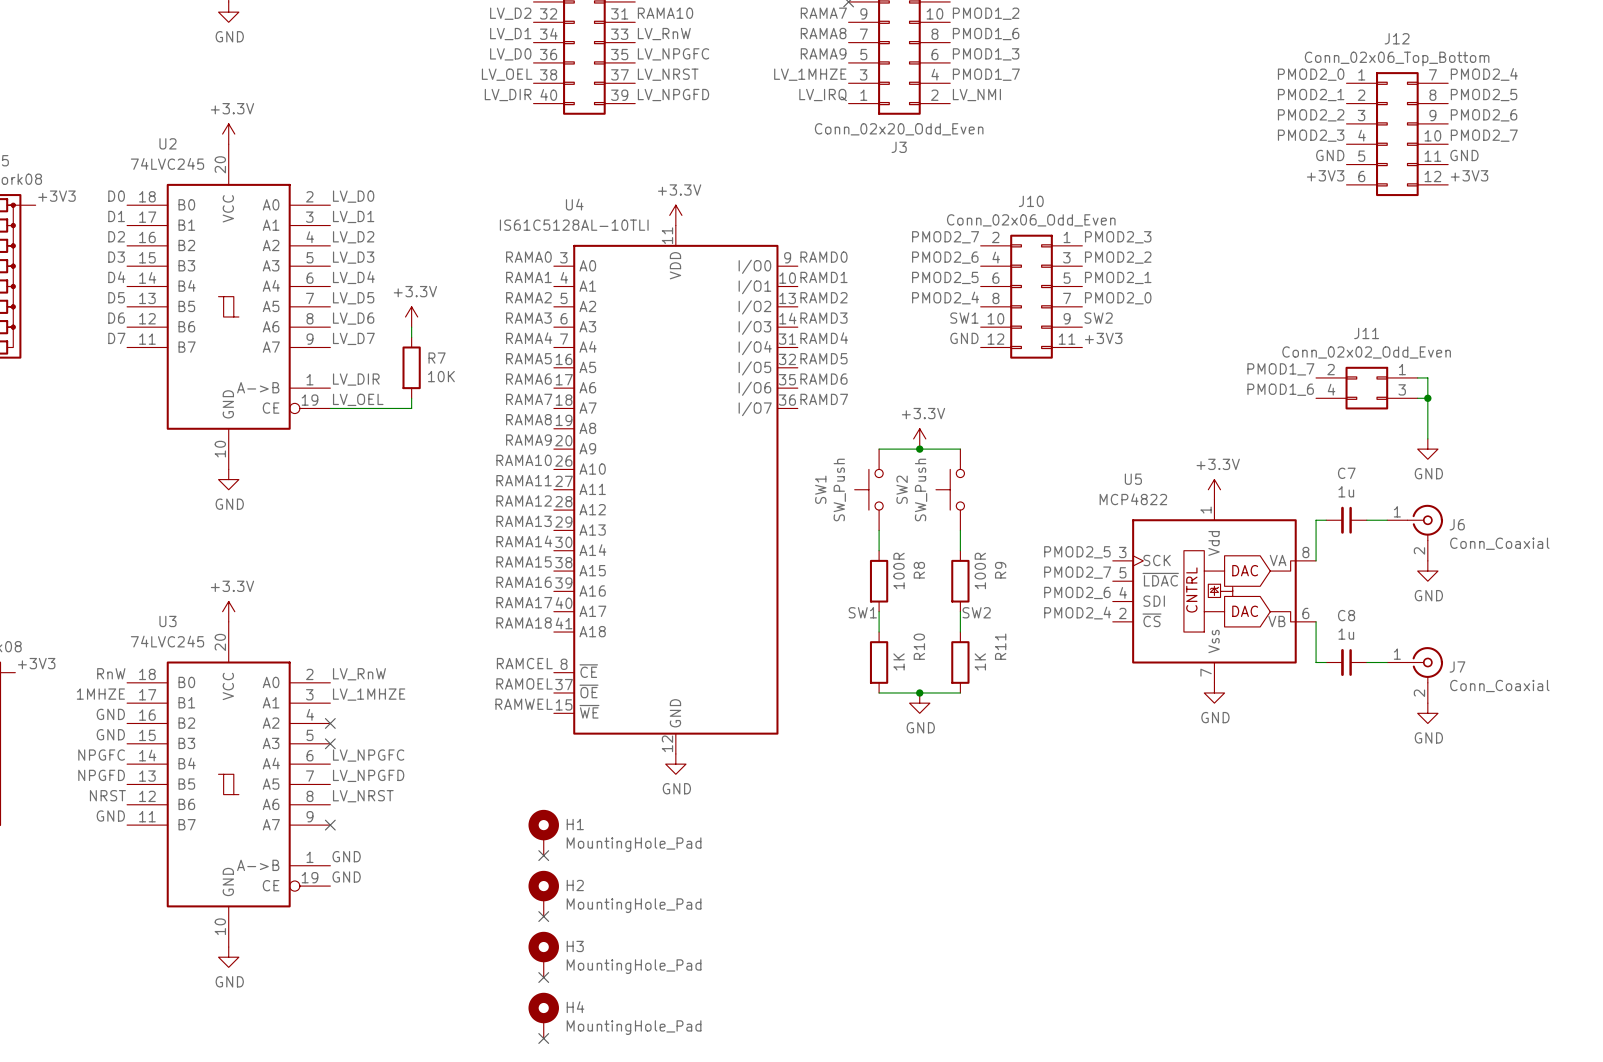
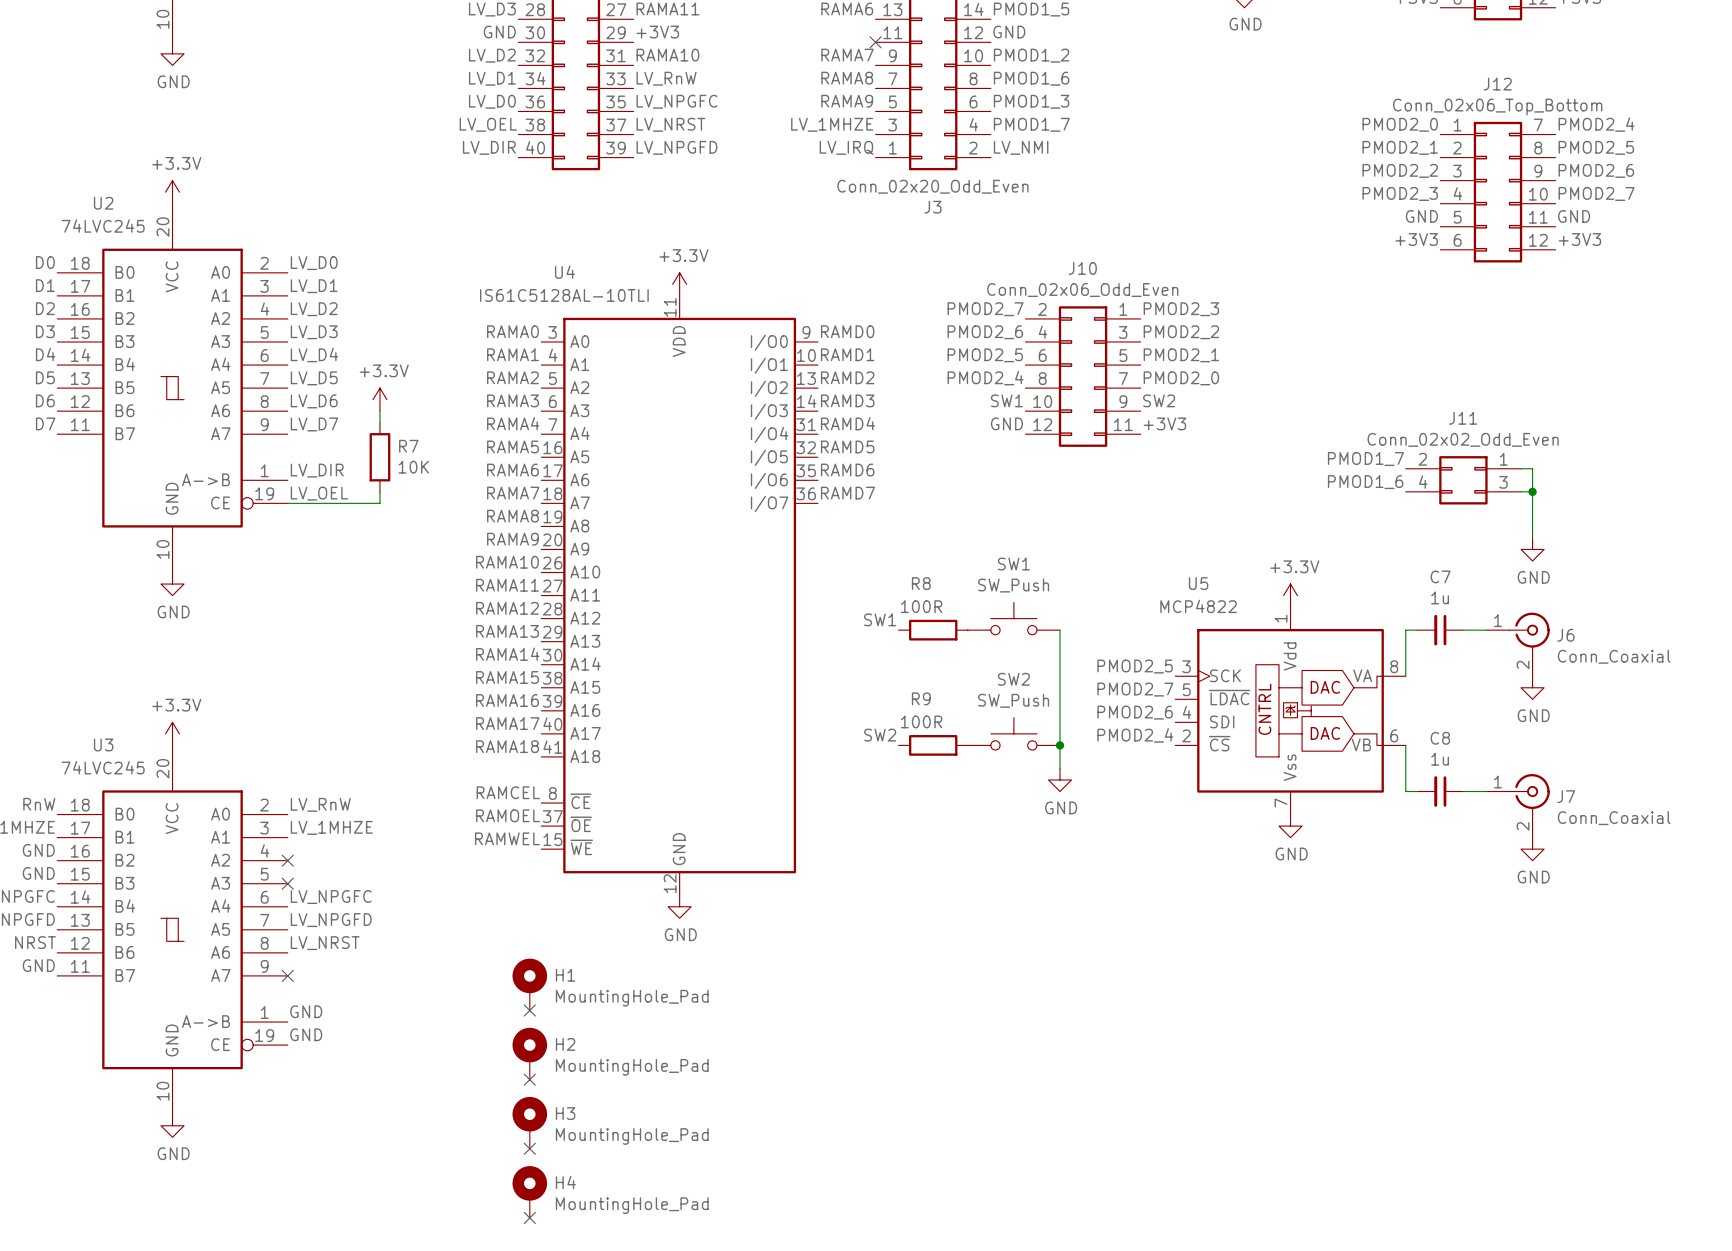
power symbol: +3.3V (919, 438) -> none
wire: (879, 449) (960, 449) -> none
junction: (919, 449) -> none
SW1 rotation: 0° (868, 489) -> 90° clockwise (1013, 618)
SW1 position: (868, 489) -> (1013, 618)
SW2 rotation: 0° (950, 489) -> 90° clockwise (1013, 733)
SW2 position: (950, 489) -> (1013, 733)
wire: none -> (1060, 630) (1060, 768)
wire: (879, 530) (879, 550) -> none
wire: (960, 530) (960, 550) -> none
R8 value position: 100R (899, 570) -> 100R (921, 606)
R8 name position: R8 (919, 570) -> R8 (921, 583)
R9 value position: 100R (980, 570) -> 100R (921, 721)
R9 name position: R9 (1000, 570) -> R9 (921, 698)
R8 rotation: 0° (879, 581) -> 90° clockwise (933, 630)
R8 position: (879, 581) -> (933, 630)
R9 rotation: 0° (960, 581) -> 90° clockwise (933, 745)
R9 position: (960, 581) -> (933, 745)
wire: (960, 611) (960, 632) -> none
label position: SW1 (862, 612) -> SW1 (880, 619)
label position: SW2 (976, 612) -> SW2 (880, 735)
junction: none -> (1060, 745)
R10: 1K (879, 662) -> none
R11: 1K (960, 662) -> none
wire: (879, 692) (960, 692) -> none
junction: (919, 692) -> none
power symbol position: GND (919, 703) -> GND (1060, 779)

